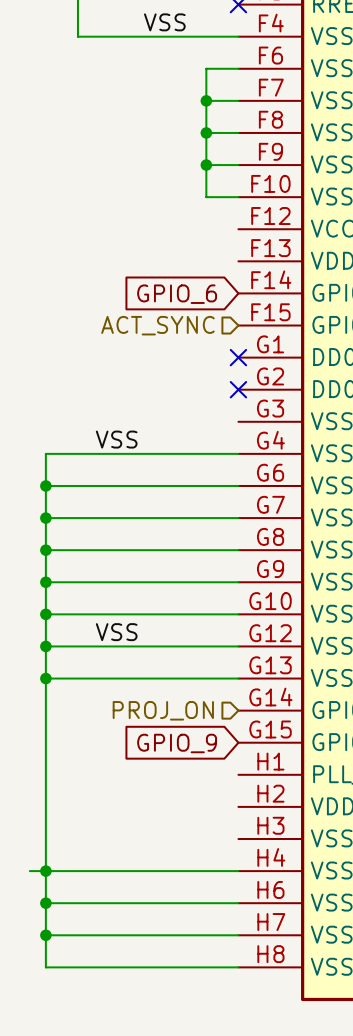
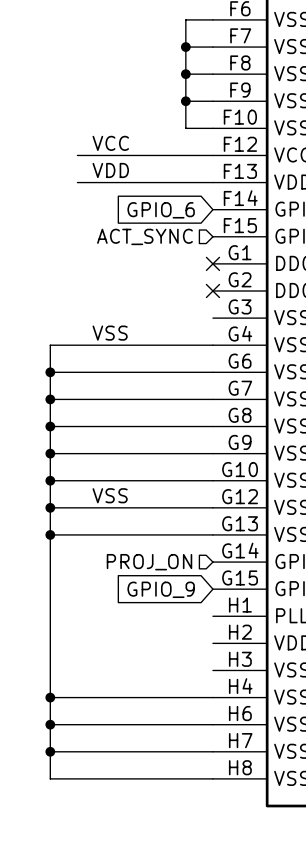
label: none -> VCC (110, 143)
wire: none -> (77, 155) (212, 155)
label: none -> VDD (110, 170)
wire: none -> (77, 182) (212, 182)
wire: (29, 871) (45, 871) -> none

